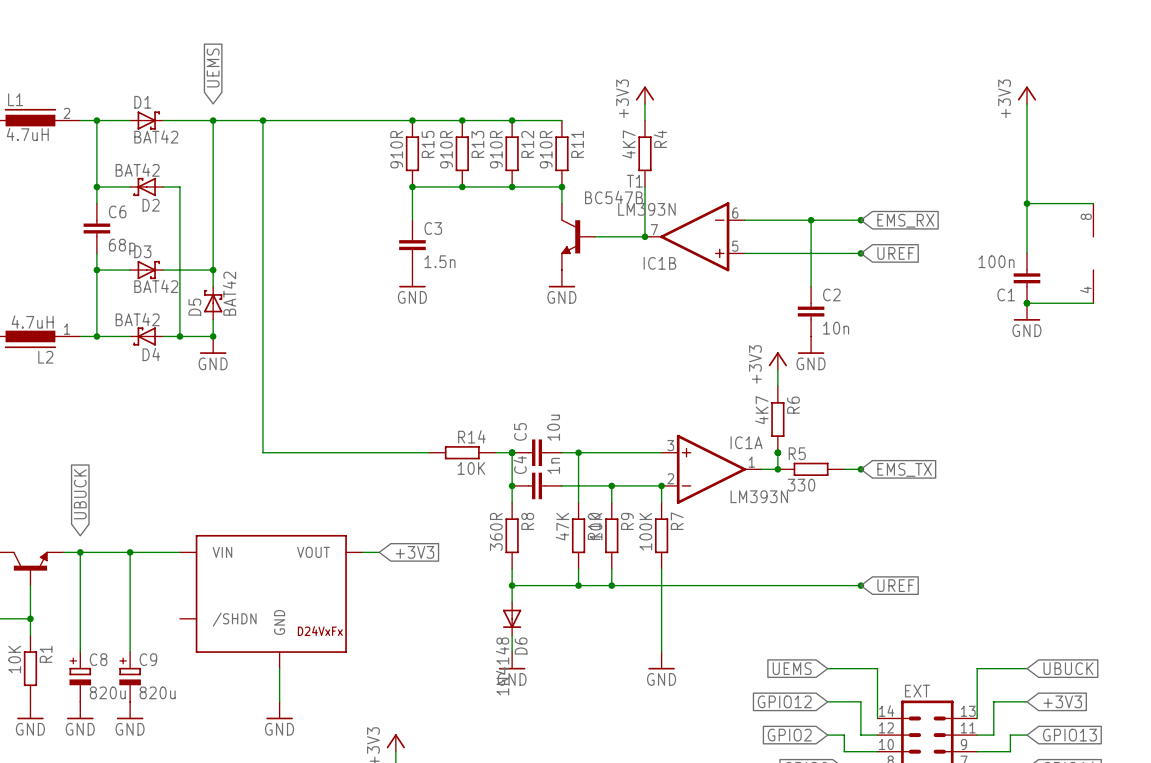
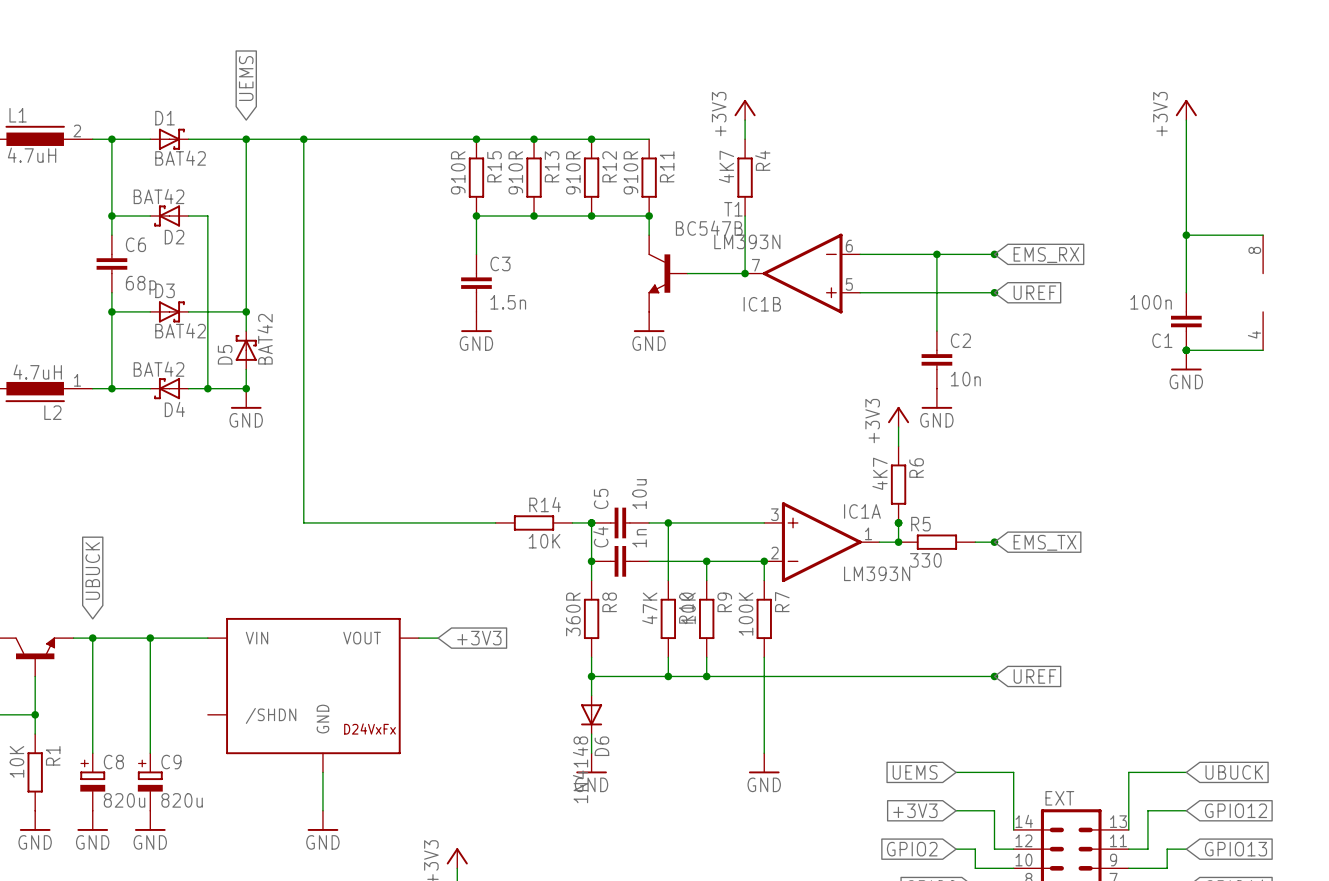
global label: GPIO12 (784, 701) -> +3V3 (915, 810)
global label: +3V3 (1062, 701) -> GPIO12 (1235, 810)

